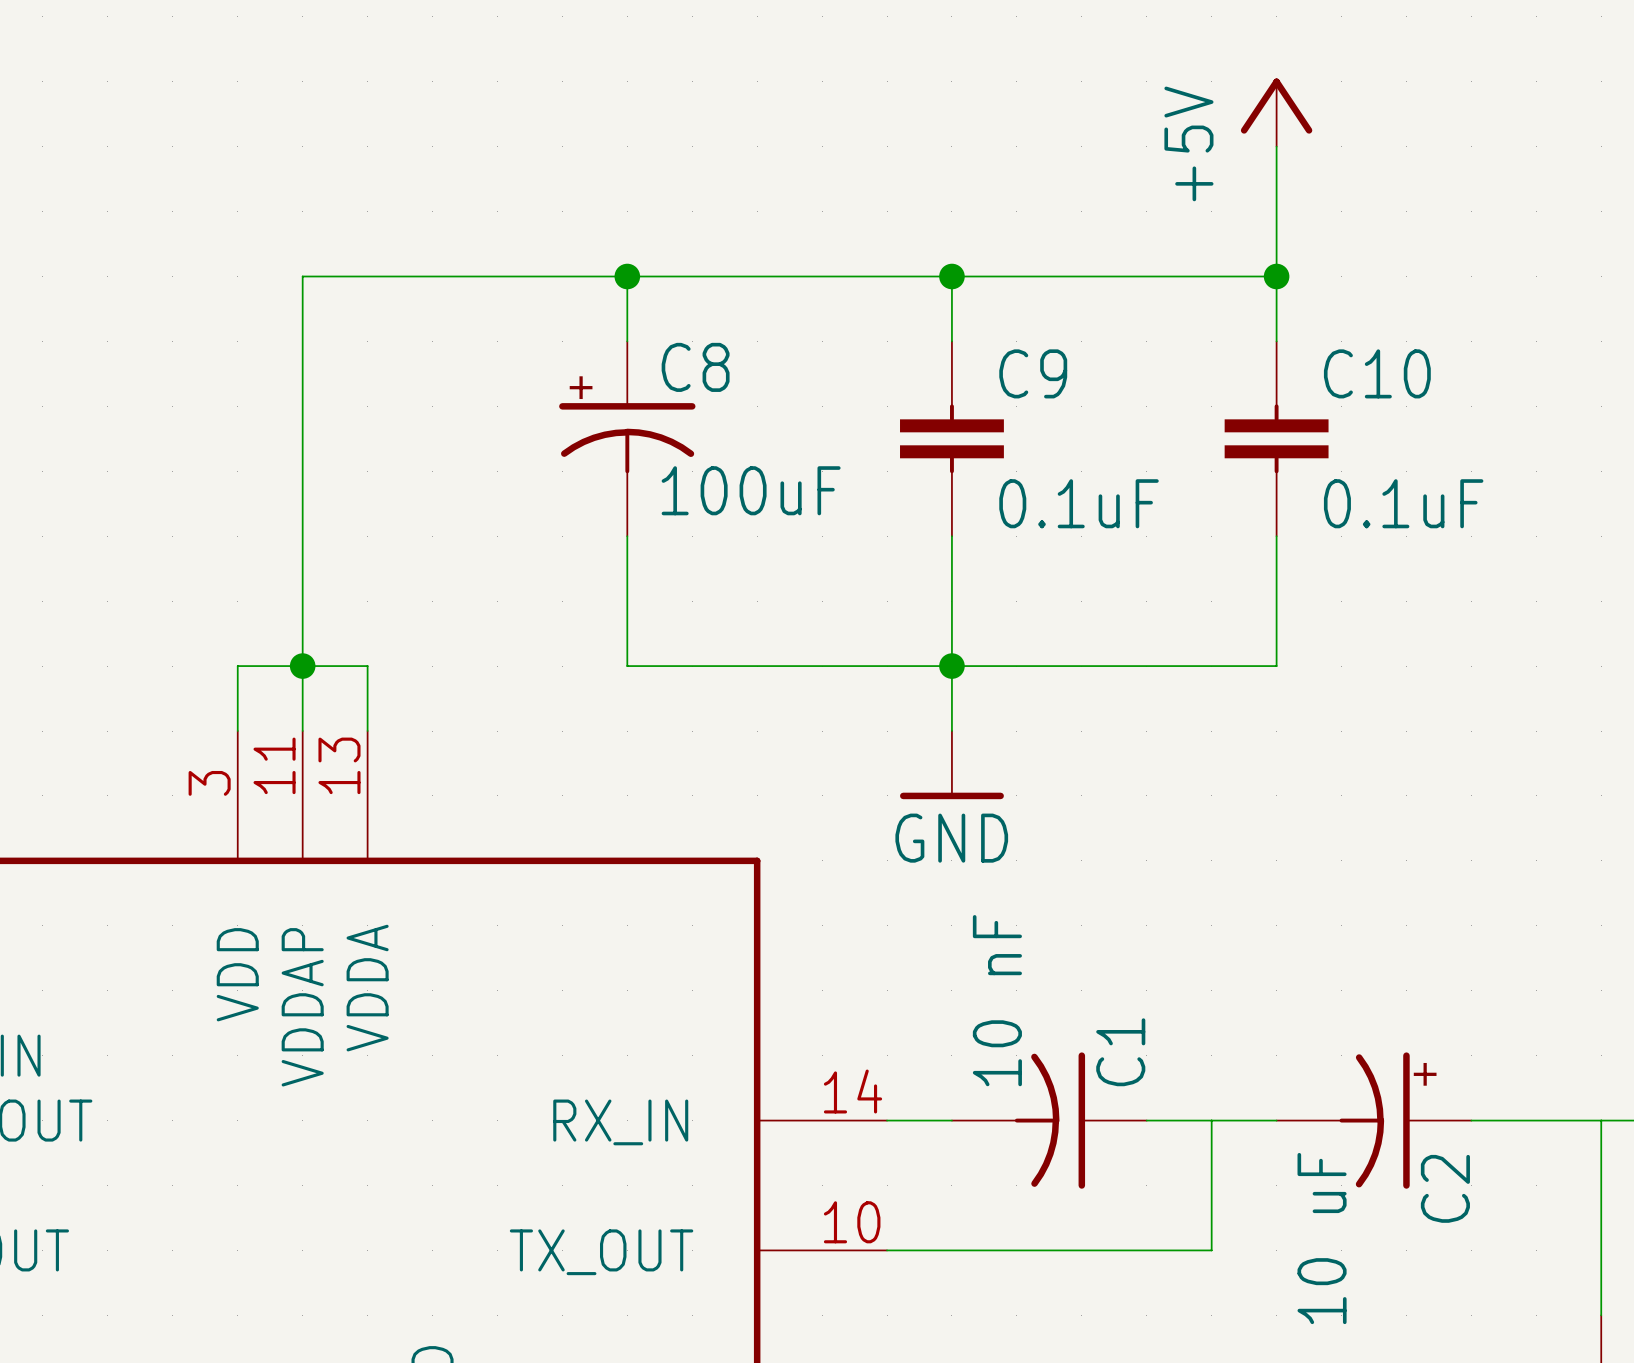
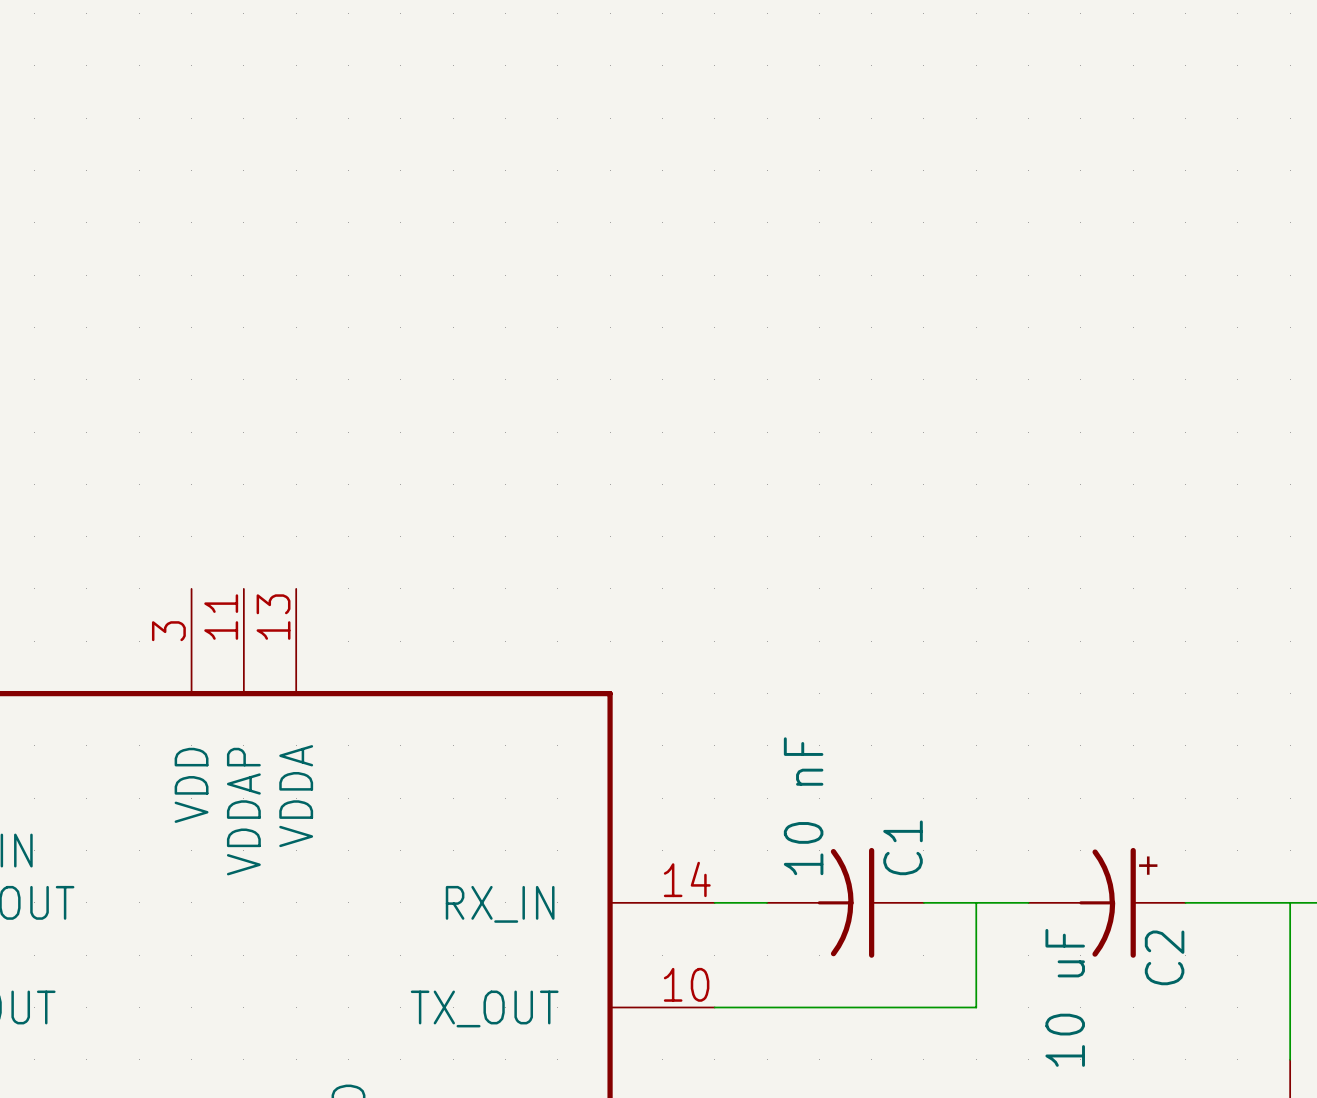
power symbol: +5V (1276, 112) -> none
wire: (1276, 146) (1276, 341) -> none
wire: (627, 276) (627, 341) -> none
junction: (627, 276) -> none
wire: (951, 276) (951, 341) -> none
junction: (951, 276) -> none
wire: (1276, 276) (302, 276) (302, 731) -> none
junction: (1276, 276) -> none
C8: 100uF (627, 438) -> none
C9: 0.1uF (951, 438) -> none
C10: 0.1uF (1276, 438) -> none
wire: (627, 536) (627, 666) (1276, 666) (1276, 536) -> none
wire: (951, 536) (951, 731) -> none
junction: (302, 666) -> none
junction: (951, 666) -> none
wire: (237, 731) (237, 666) (367, 666) (367, 731) -> none
power symbol: GND (951, 765) -> none

